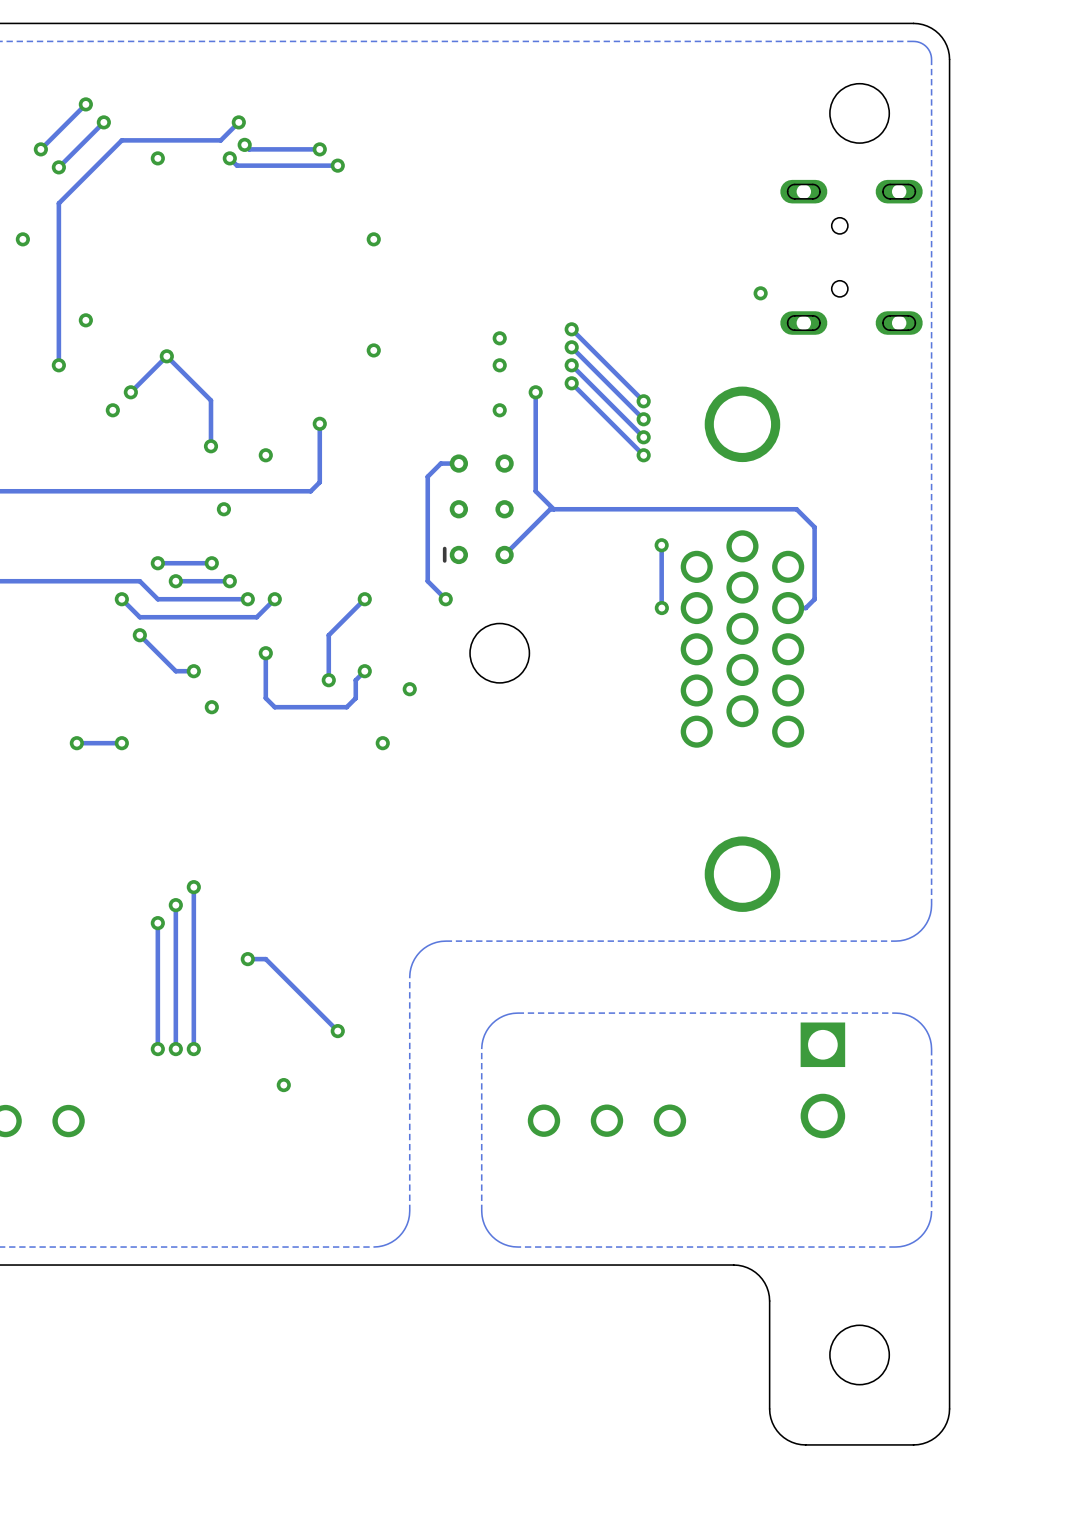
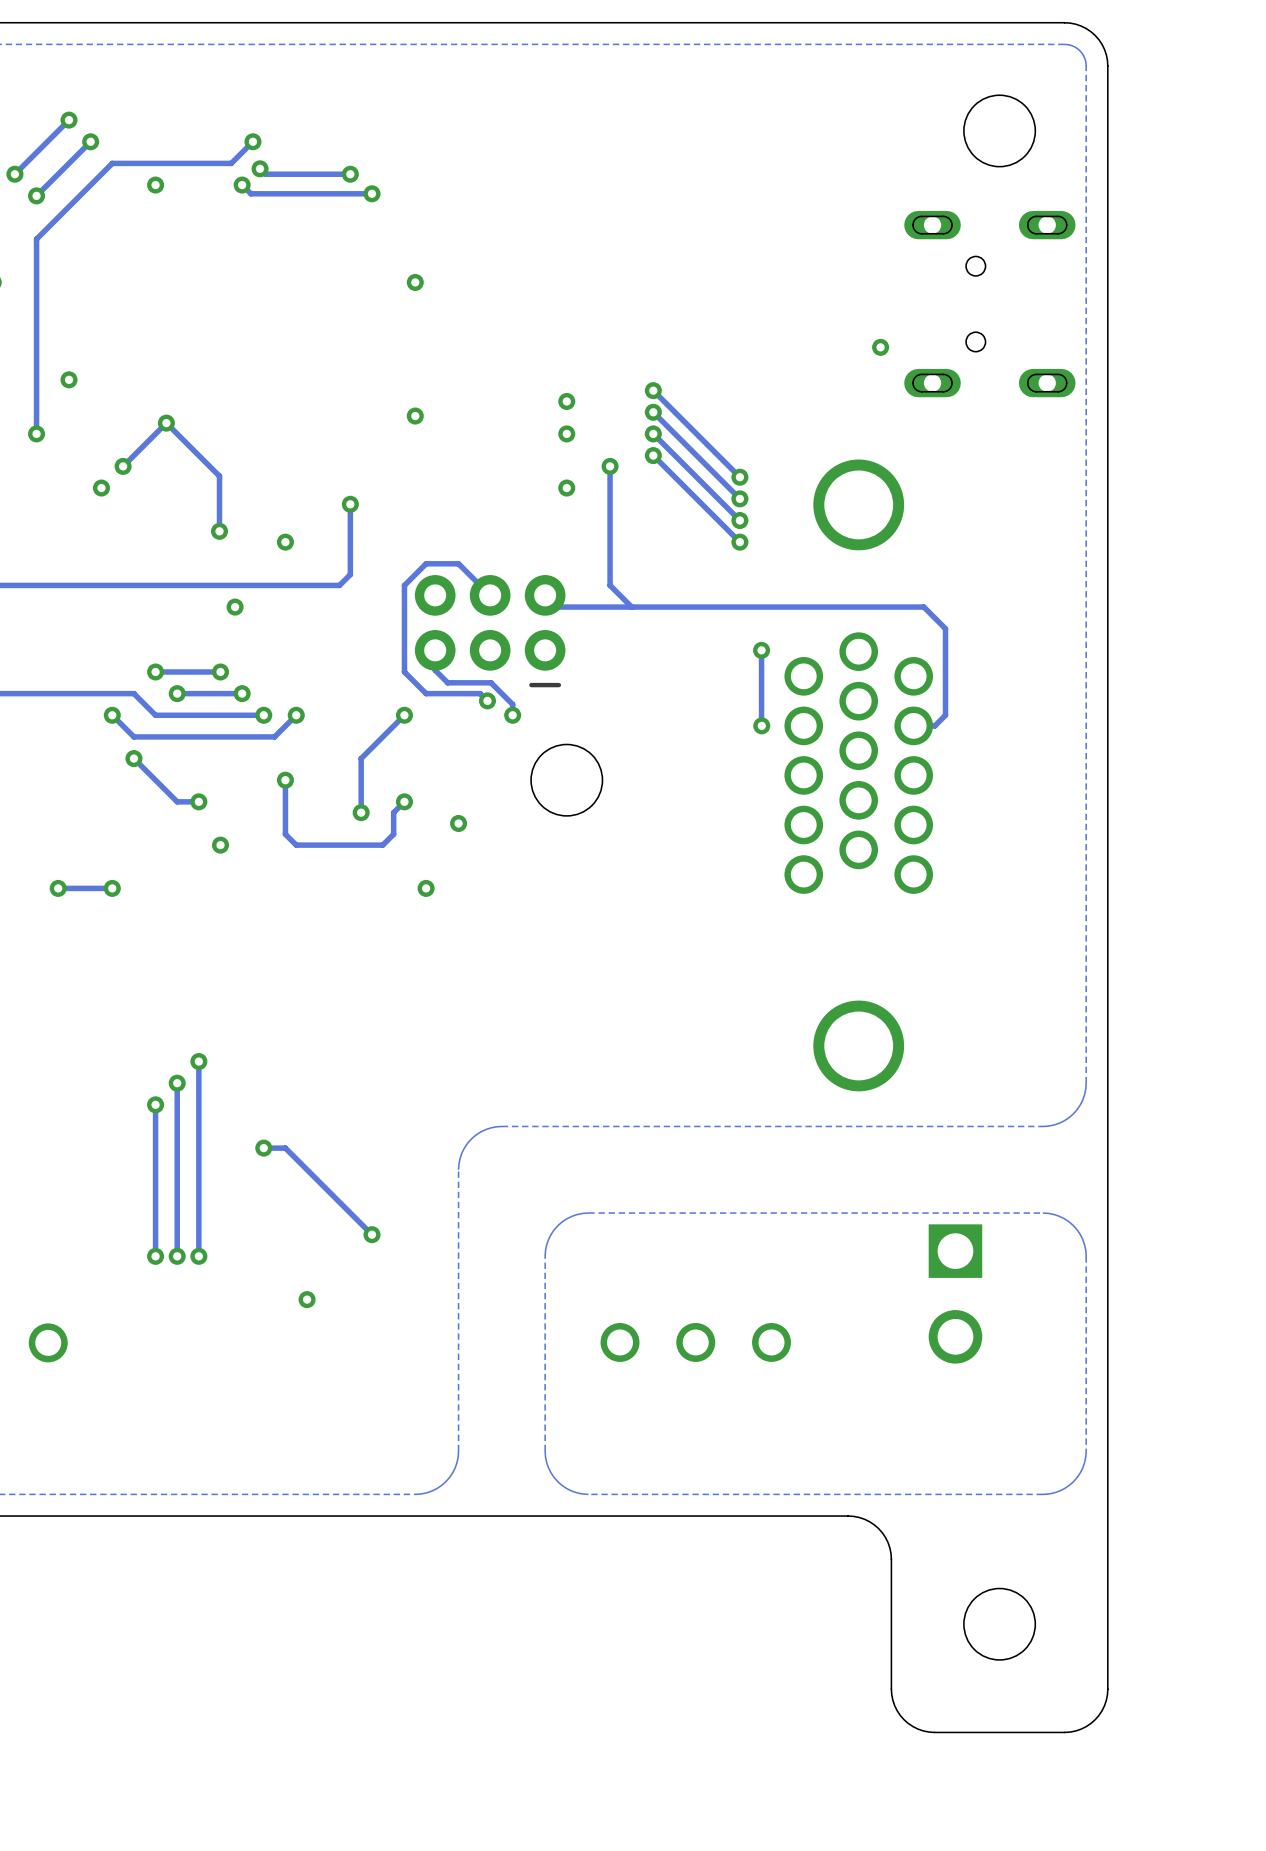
track: (458, 463) (440, 463) (427, 476) (427, 581) -> (490, 595) (458, 563) (426, 563) (404, 585) (404, 671) (426, 693) (480, 693)
part: (478, 509) -> none
track: (550, 509) (504, 554) -> (627, 607) (556, 607) (545, 595)
part: none -> (490, 631)
track: none -> (435, 650) (435, 670) (447, 682) (491, 682) (512, 704) (512, 715)
track: (433, 587) (445, 599) -> none
via: none -> (487, 700)
via: (445, 599) -> none
via: none -> (512, 715)

